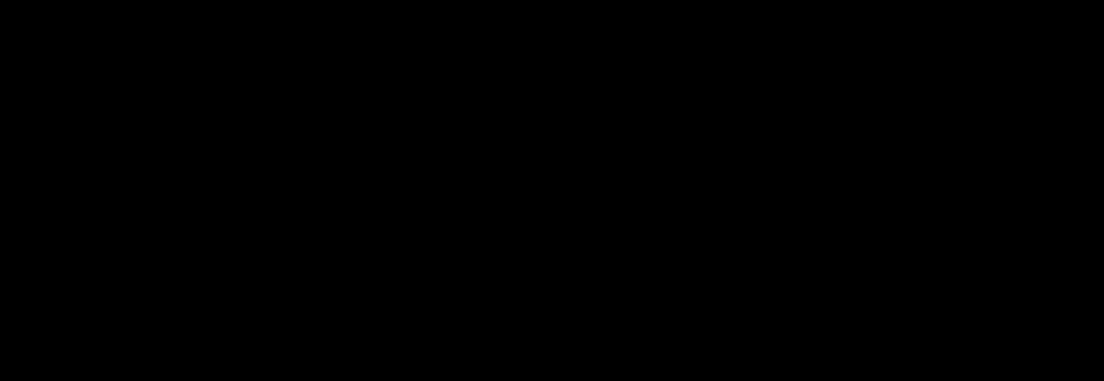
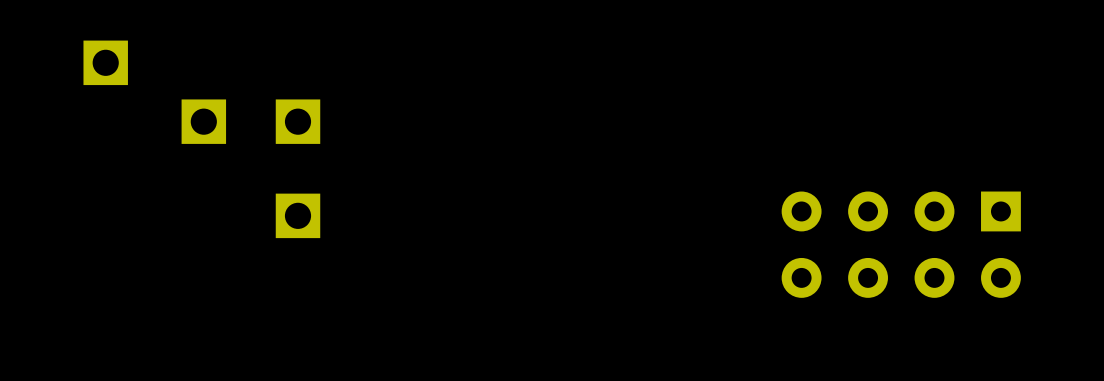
part: none -> (105, 62)
part: none -> (203, 121)
part: none -> (298, 121)
part: none -> (298, 215)
part: none -> (901, 244)

